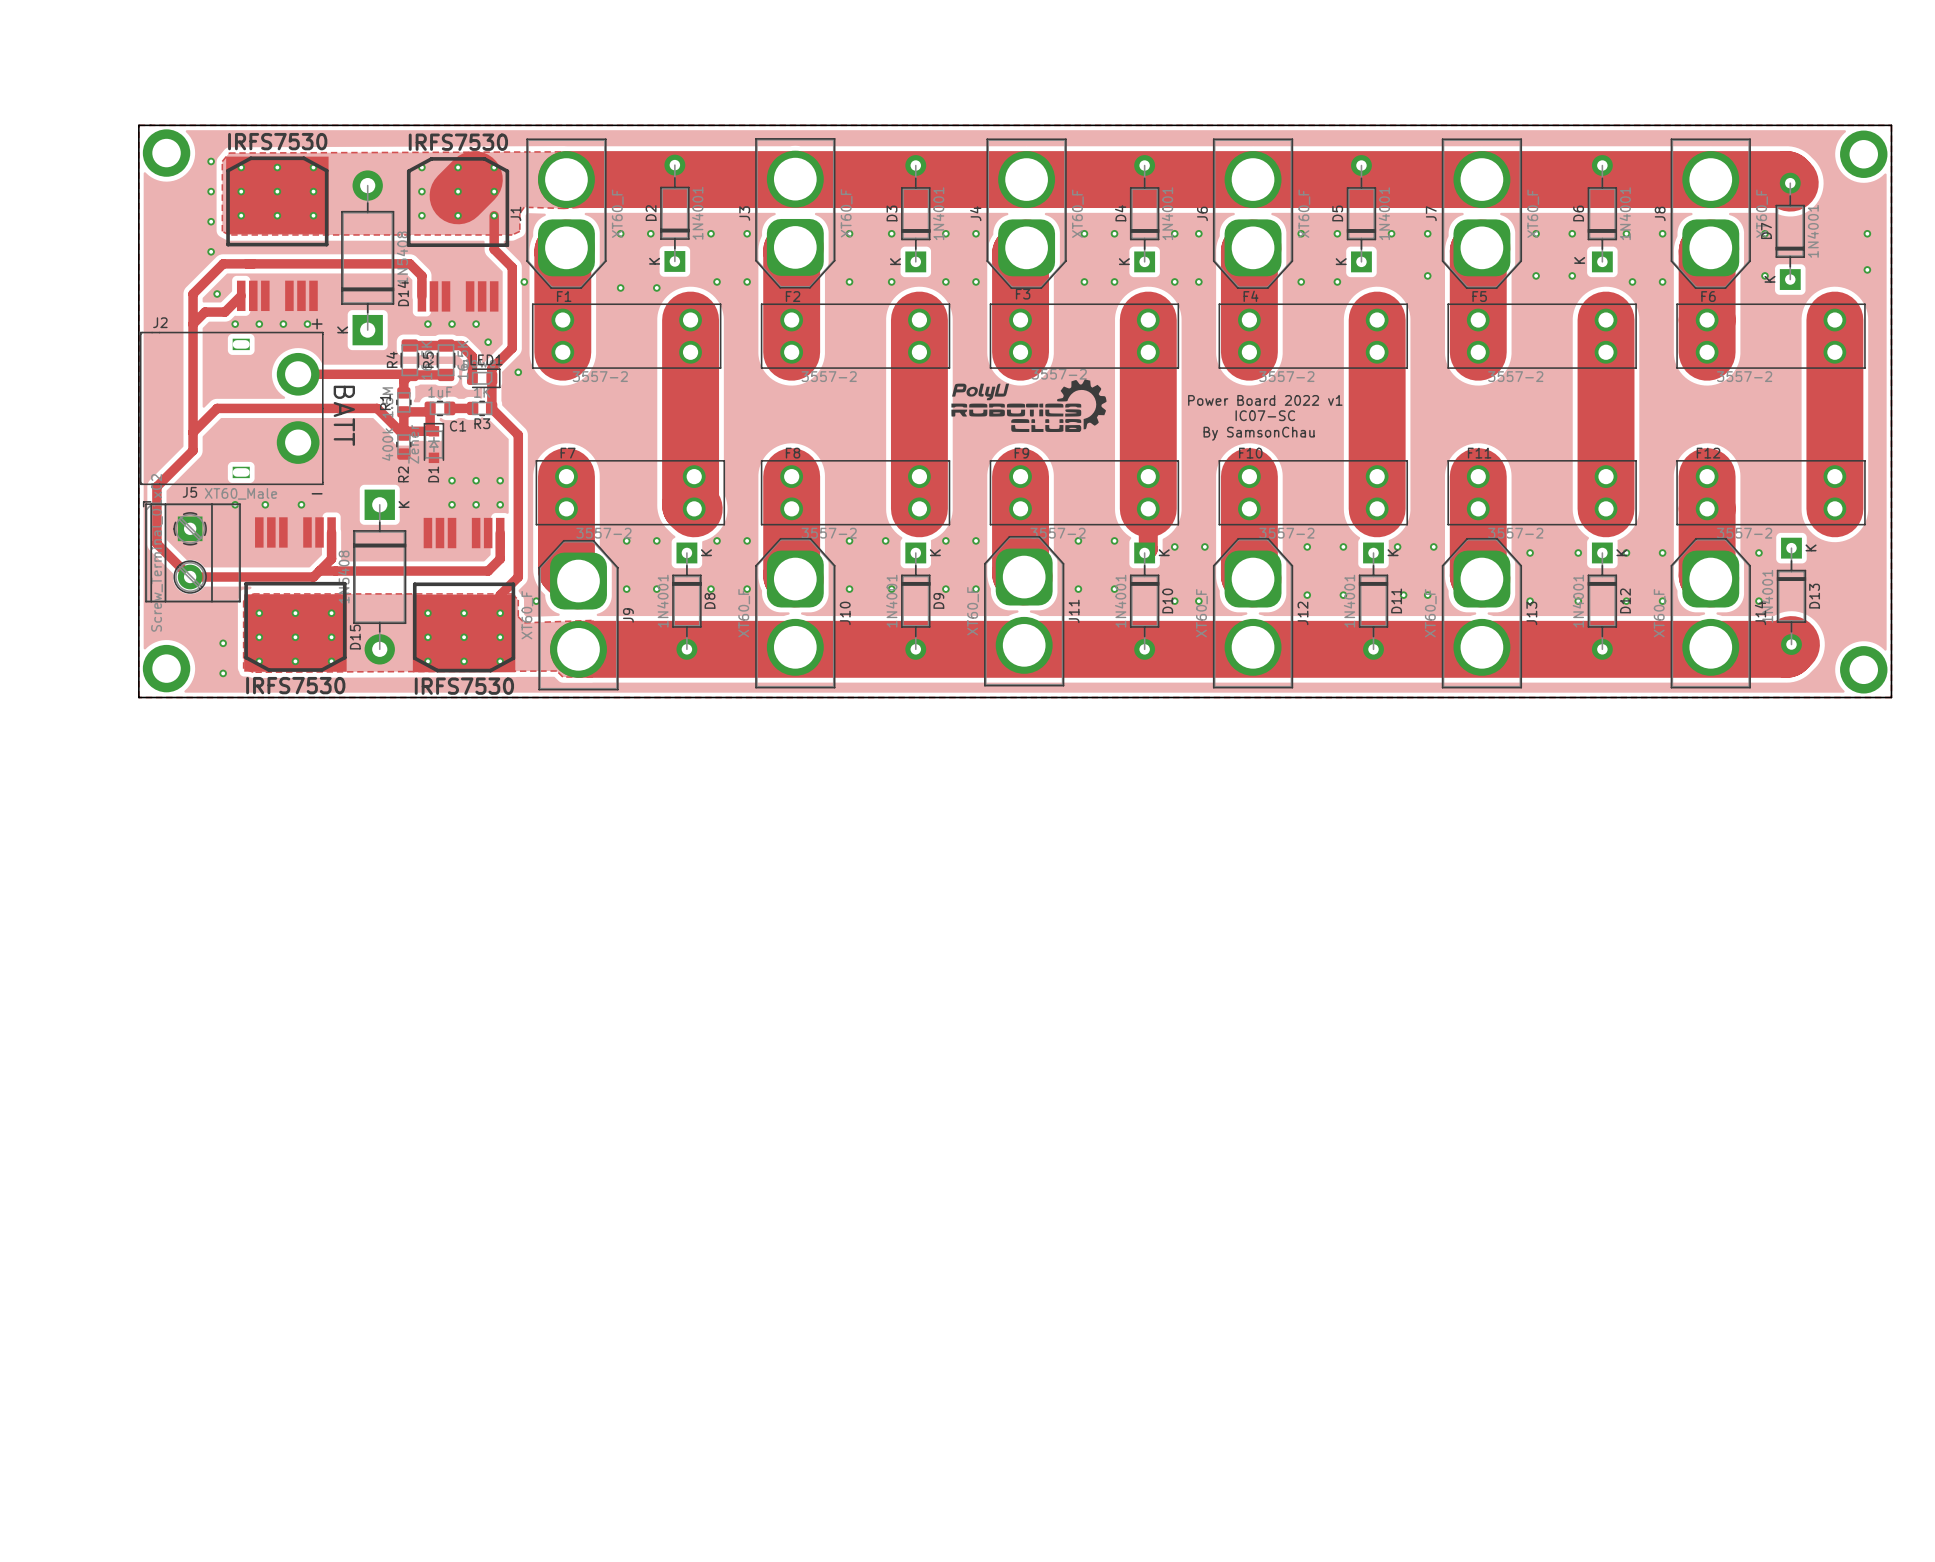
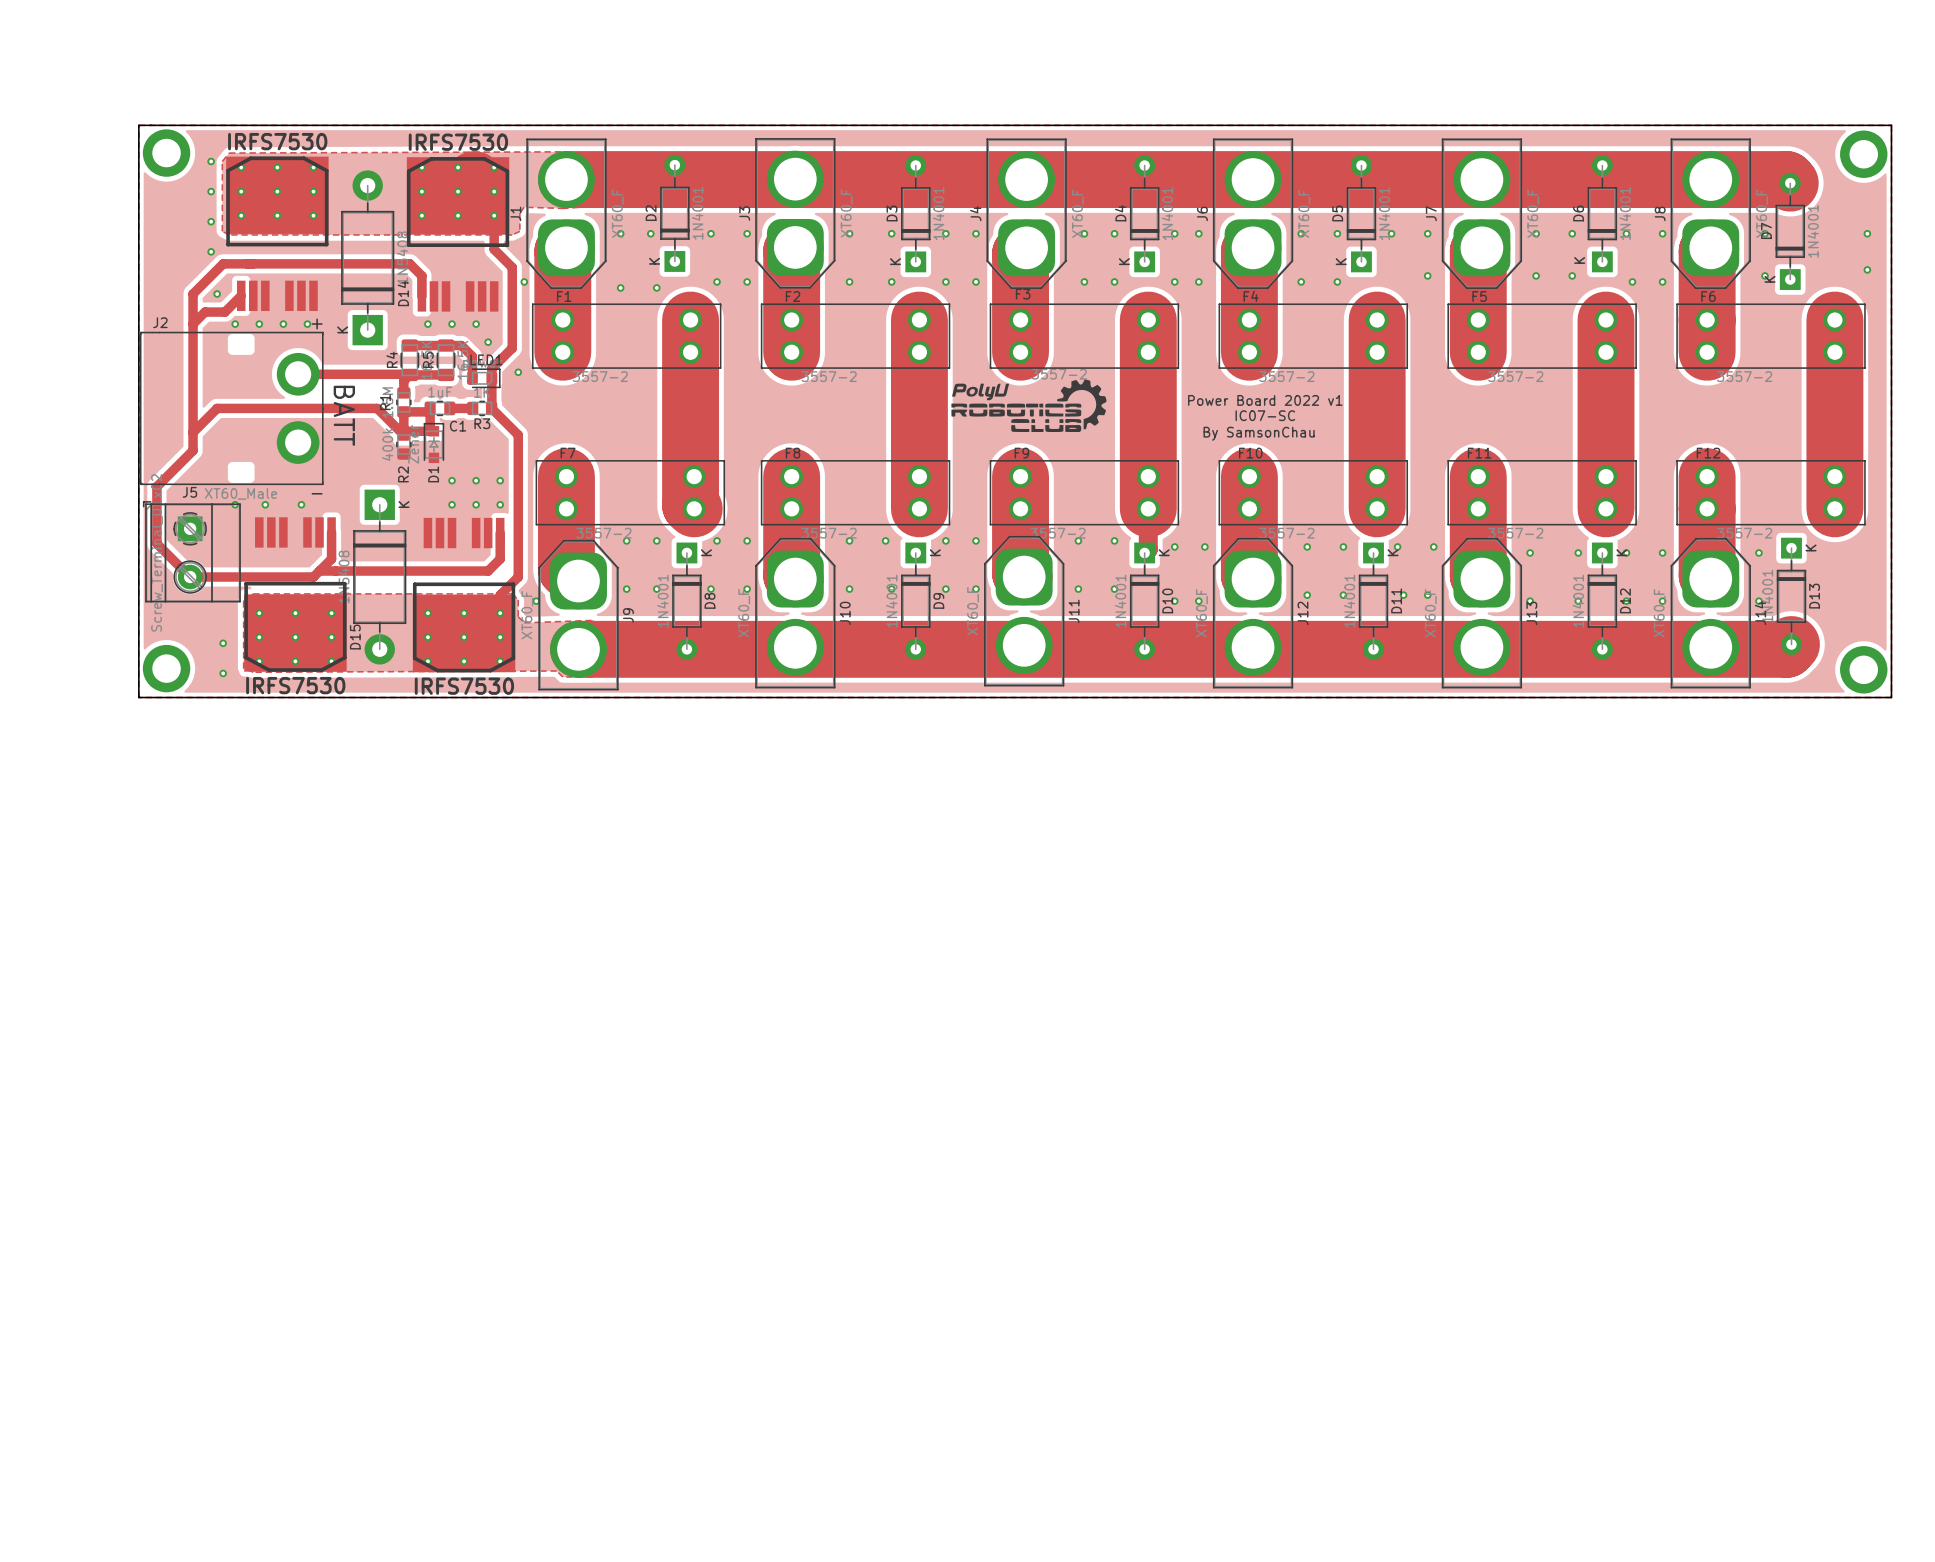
part footprint: [406, 157, 510, 312] -> [406, 157, 510, 312]
J2 footprint: [140, 318, 324, 495] -> [140, 318, 324, 495]

